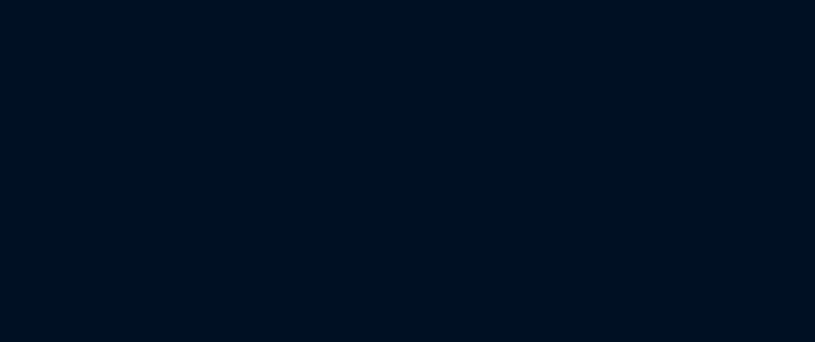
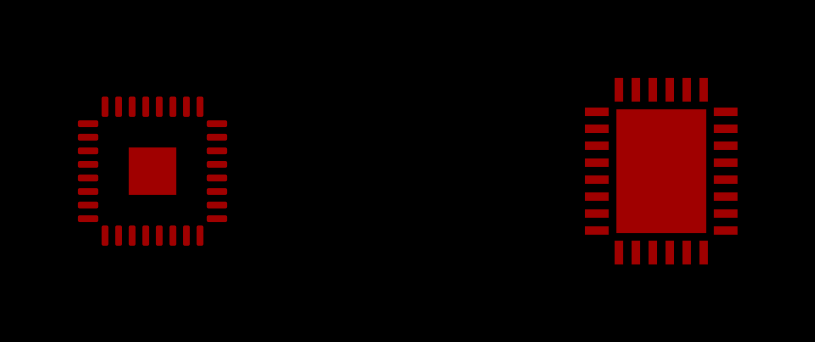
part: none -> (152, 171)
part: none -> (661, 171)

